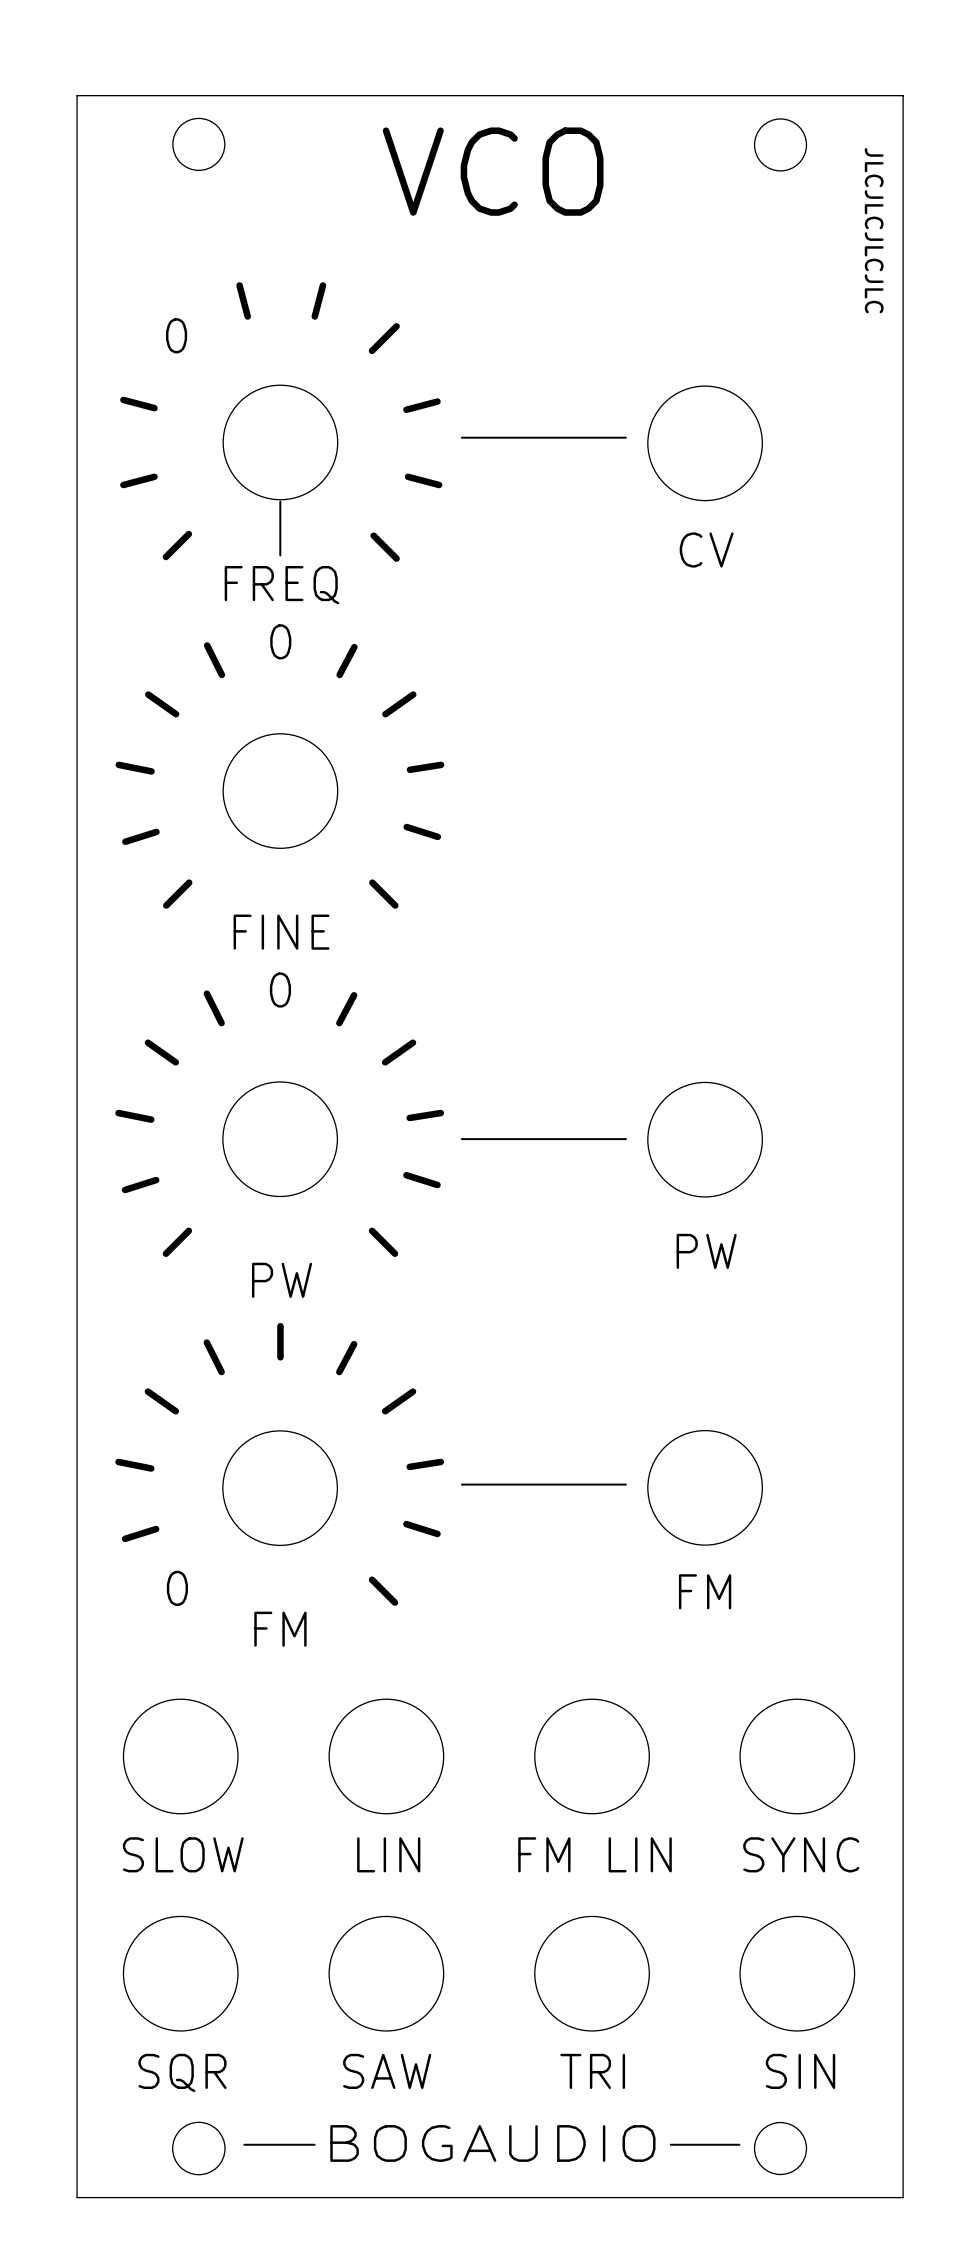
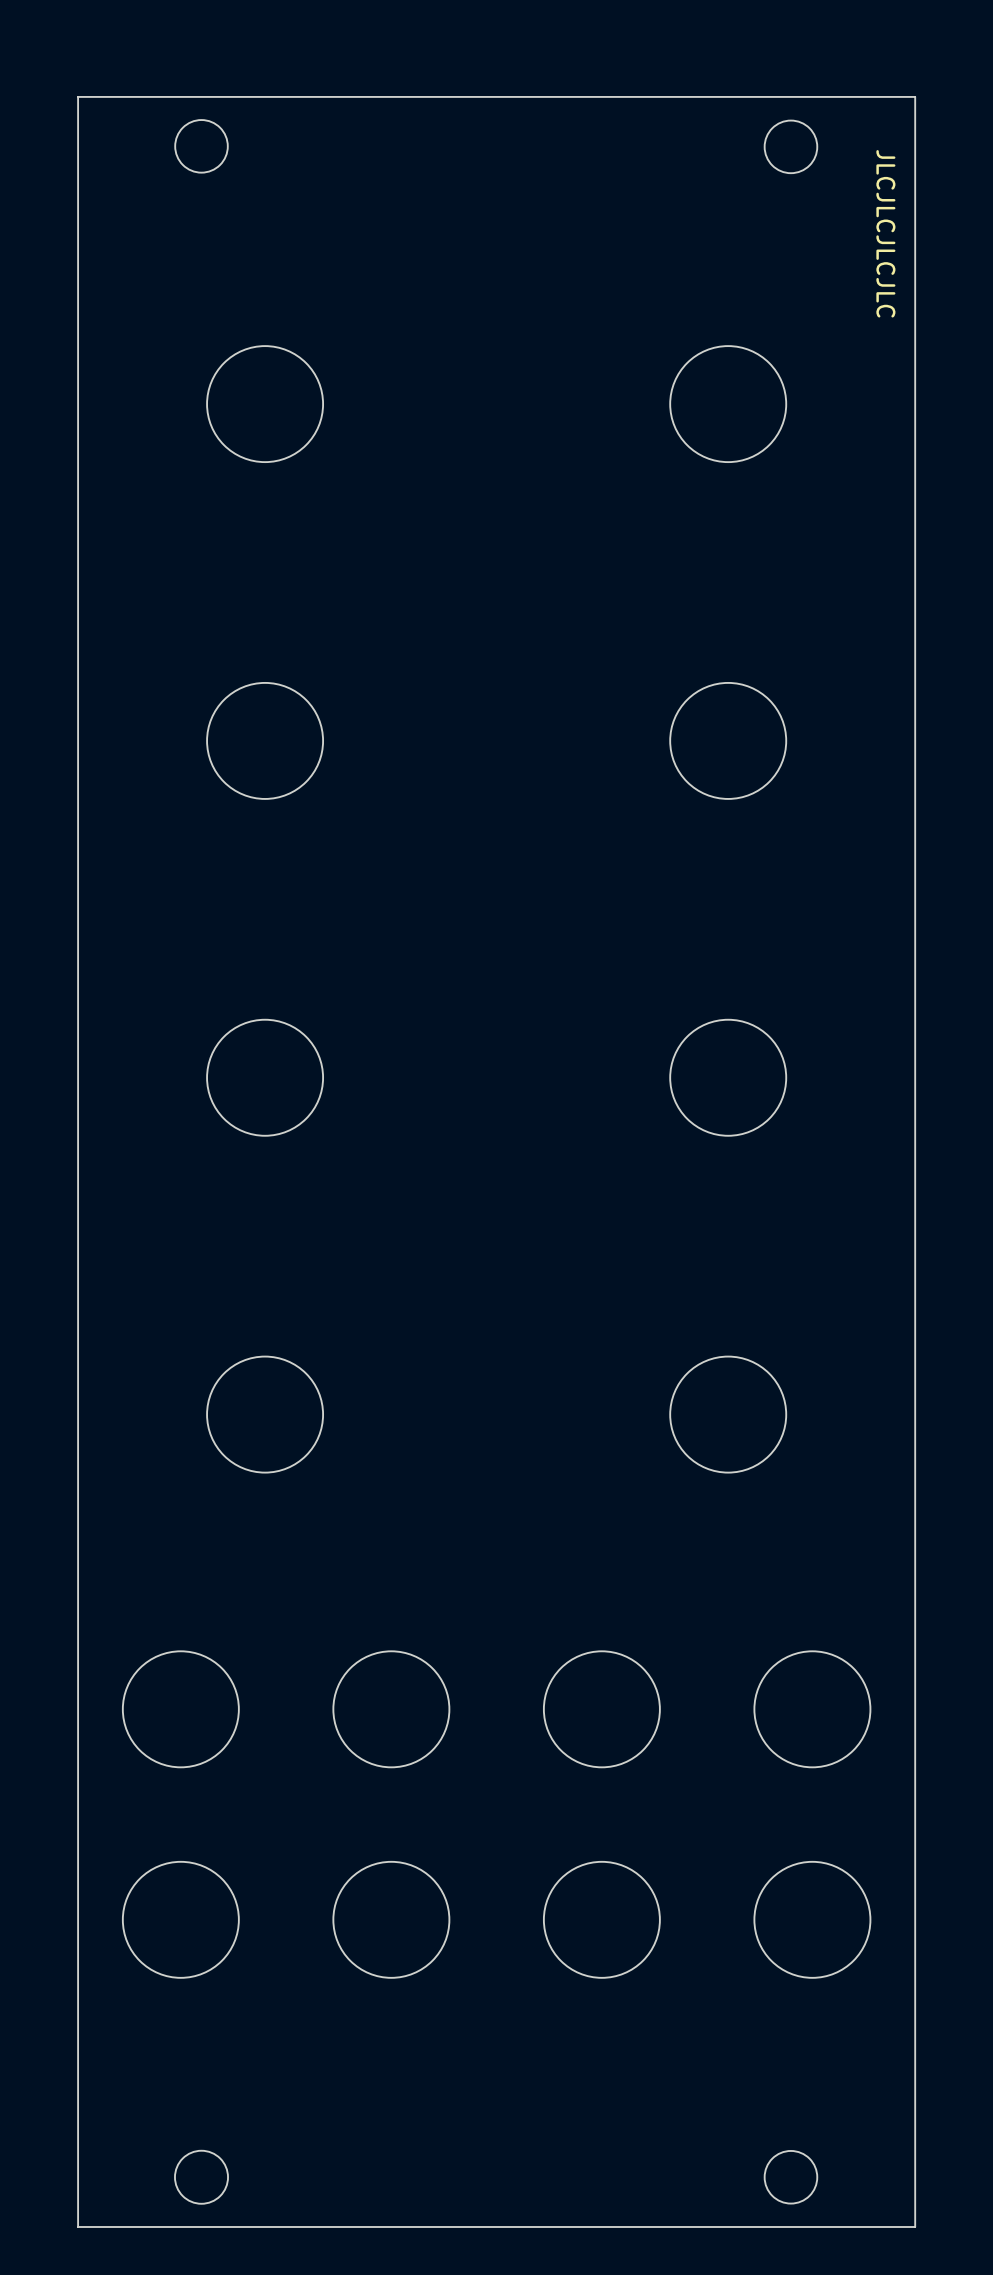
text: VCO (493, 171) -> none
drawing: [115, 282, 445, 1606] -> none
line: (625, 437) (461, 437) -> none
round board edge position: (280, 442) -> (265, 404)
round board edge position: (705, 443) -> (728, 404)
line: (280, 501) (280, 555) -> none
text: CV (706, 549) -> none
round board edge: none -> [669, 682, 787, 800]
round board edge position: (280, 791) -> (265, 740)
round board edge position: (280, 1139) -> (265, 1077)
line: (625, 1139) (461, 1139) -> none
round board edge position: (705, 1139) -> (728, 1077)
text: PW (706, 1251) -> none
line: (625, 1484) (461, 1484) -> none
round board edge position: (705, 1487) -> (728, 1414)
round board edge position: (280, 1488) -> (265, 1414)
text: FM (705, 1591) -> none
round board edge: none -> [122, 1650, 240, 1768]
round board edge: none -> [332, 1650, 450, 1768]
round board edge: none -> [543, 1650, 661, 1768]
round board edge: none -> [753, 1650, 871, 1768]
round board edge: [123, 1698, 239, 1815] -> none
round board edge: [328, 1698, 445, 1815] -> none
round board edge: [534, 1698, 650, 1815] -> none
round board edge: [739, 1698, 855, 1815] -> none
round board edge: none -> [122, 1861, 240, 1979]
round board edge: none -> [332, 1861, 450, 1979]
round board edge: none -> [543, 1861, 661, 1979]
round board edge: none -> [753, 1861, 871, 1979]
text: SLOW (183, 1854) -> none
text: LIN (388, 1854) -> none
text: FM LIN (595, 1854) -> none
text: SYNC (801, 1854) -> none
round board edge: [123, 1916, 239, 2032] -> none
round board edge: [328, 1916, 445, 2032] -> none
round board edge: [534, 1916, 650, 2032] -> none
round board edge: [739, 1916, 855, 2032] -> none
text: SAW (387, 2071) -> none
text: TRI (592, 2071) -> none
text: SIN (800, 2071) -> none
text: SQR (182, 2072) -> none
text: BOGAUDIO (492, 2143) -> none
line: (314, 2144) (244, 2144) -> none
line: (739, 2144) (670, 2144) -> none

